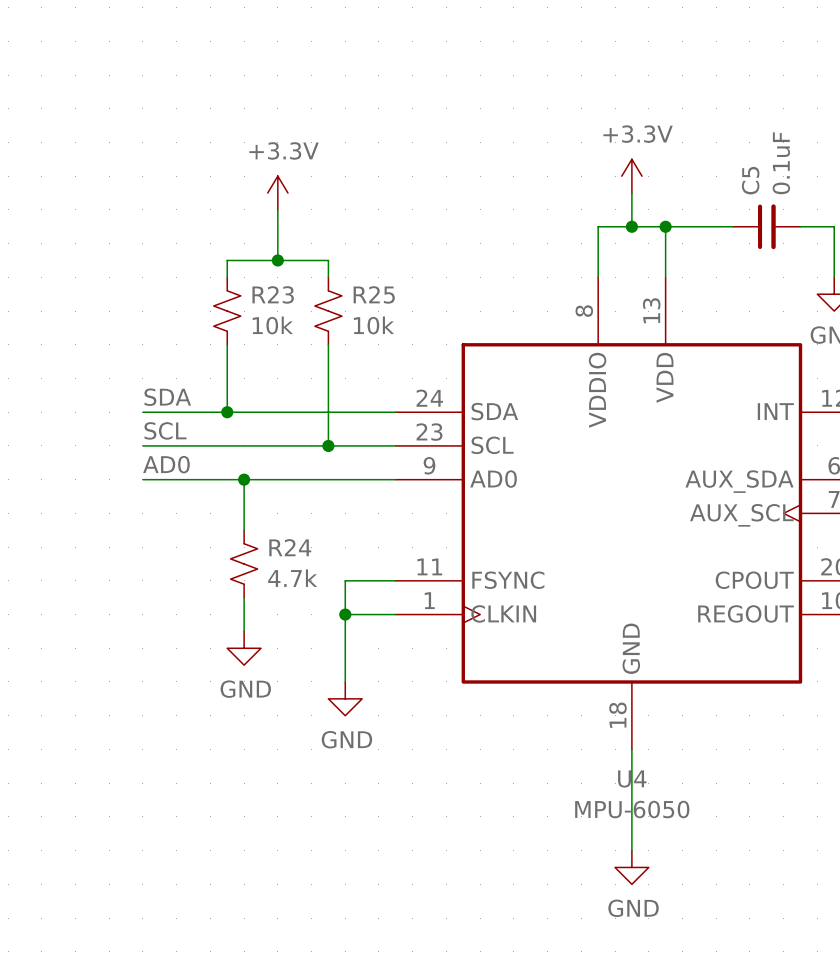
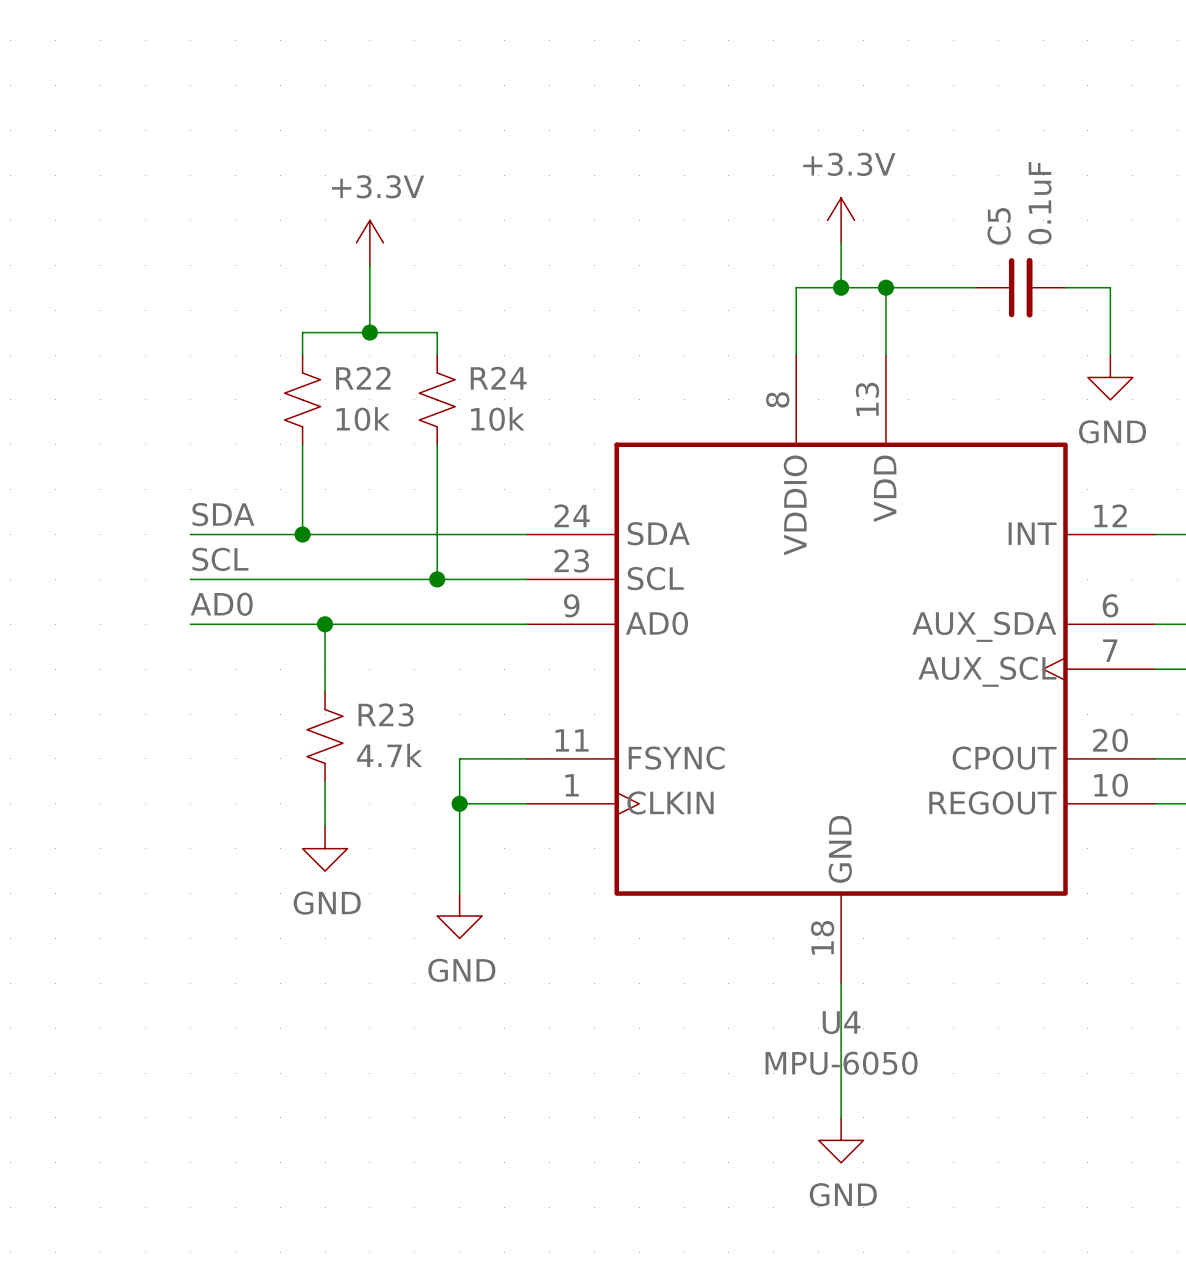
R23 name: R23 (273, 294) -> R22 (363, 378)
R25 name: R25 (374, 294) -> R24 (498, 378)
R24 name: R24 (290, 547) -> R23 (386, 715)

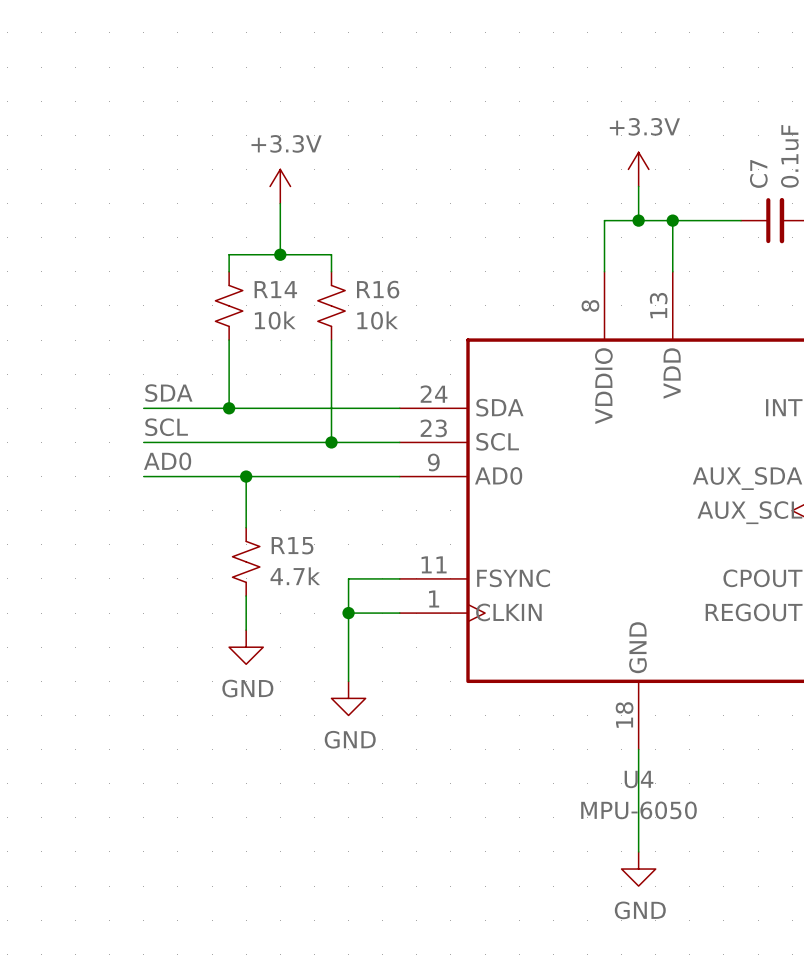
C5 name: C5 (999, 226) -> C7 (758, 173)
R22 name: R22 (363, 378) -> R14 (275, 289)
R24 name: R24 (498, 378) -> R16 (378, 289)
R23 name: R23 (386, 715) -> R15 (292, 545)

